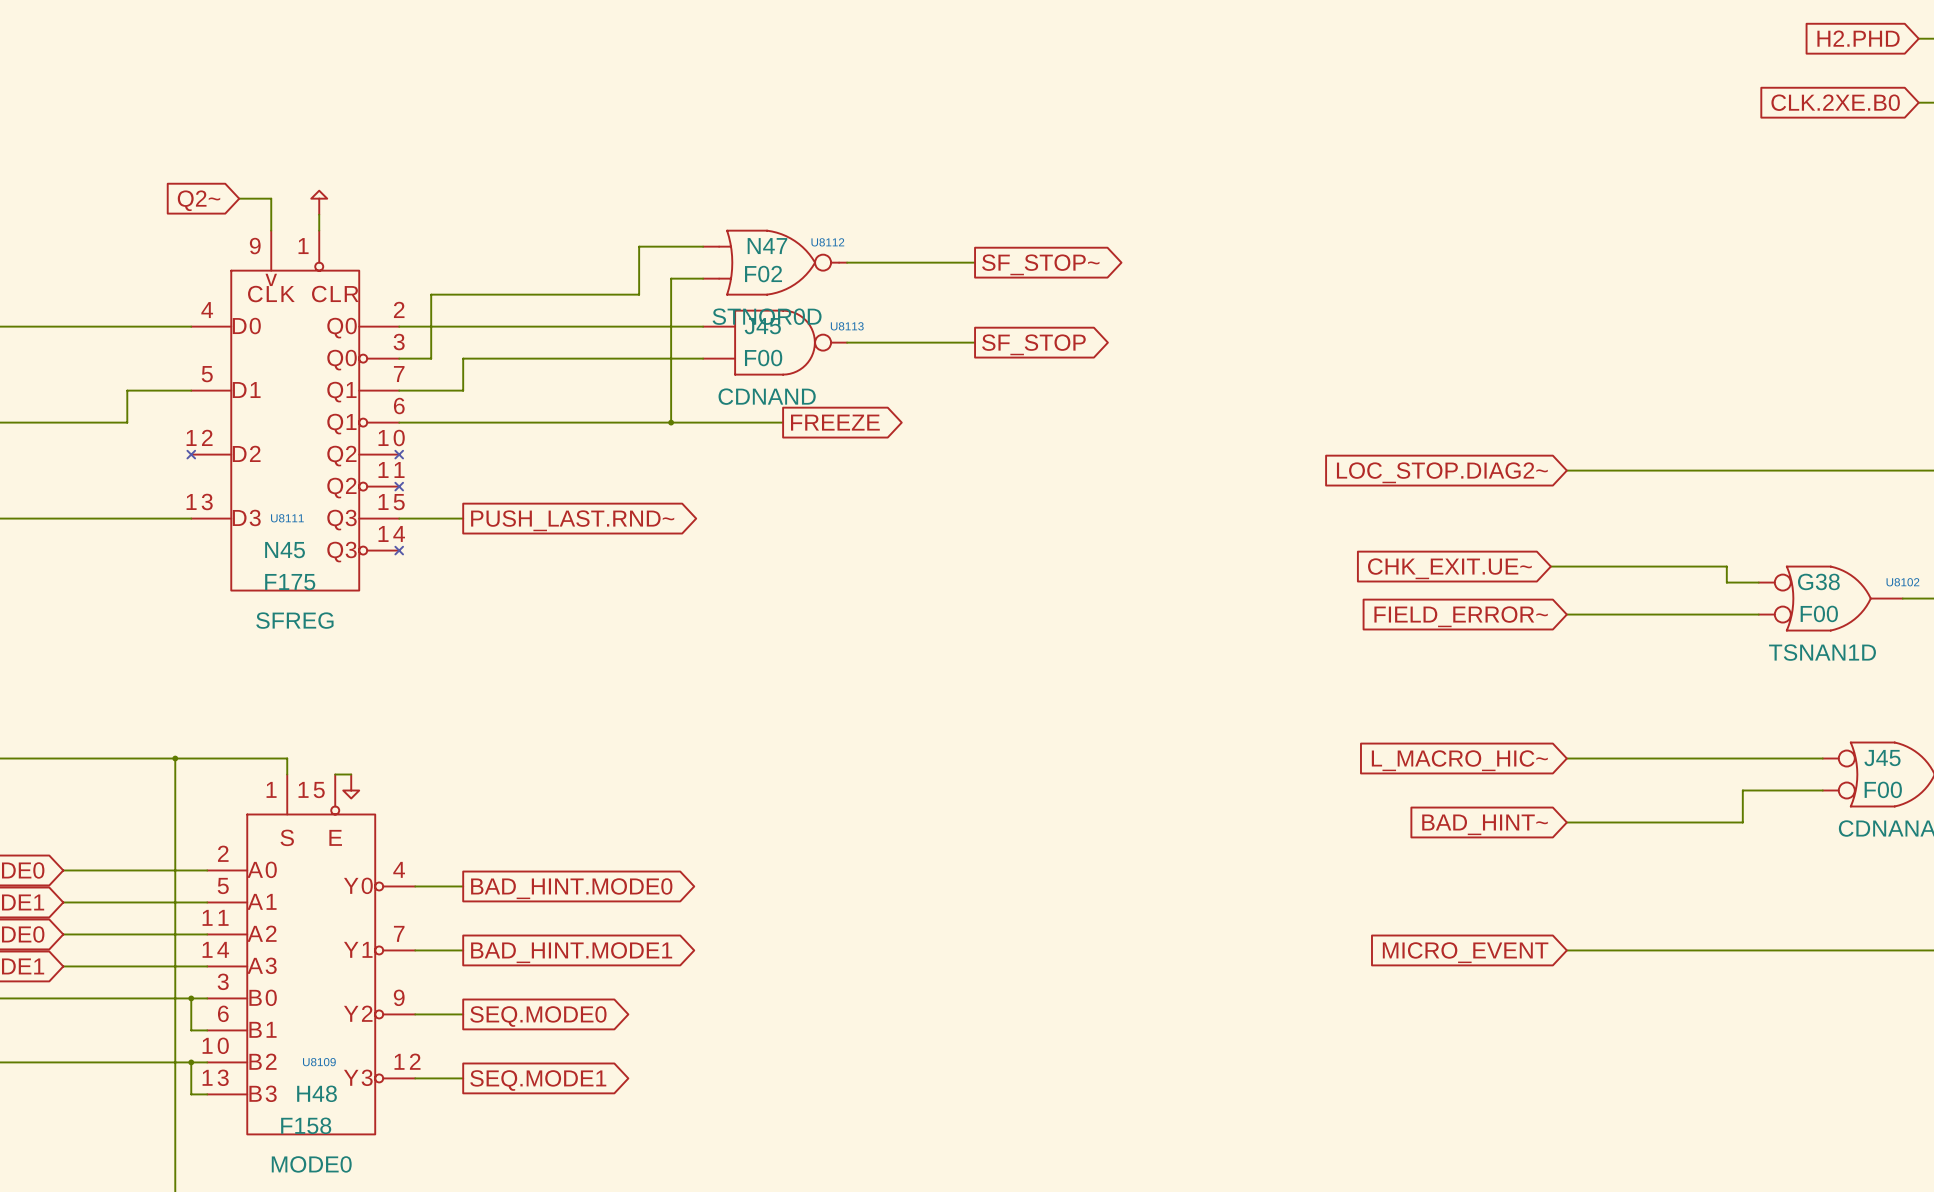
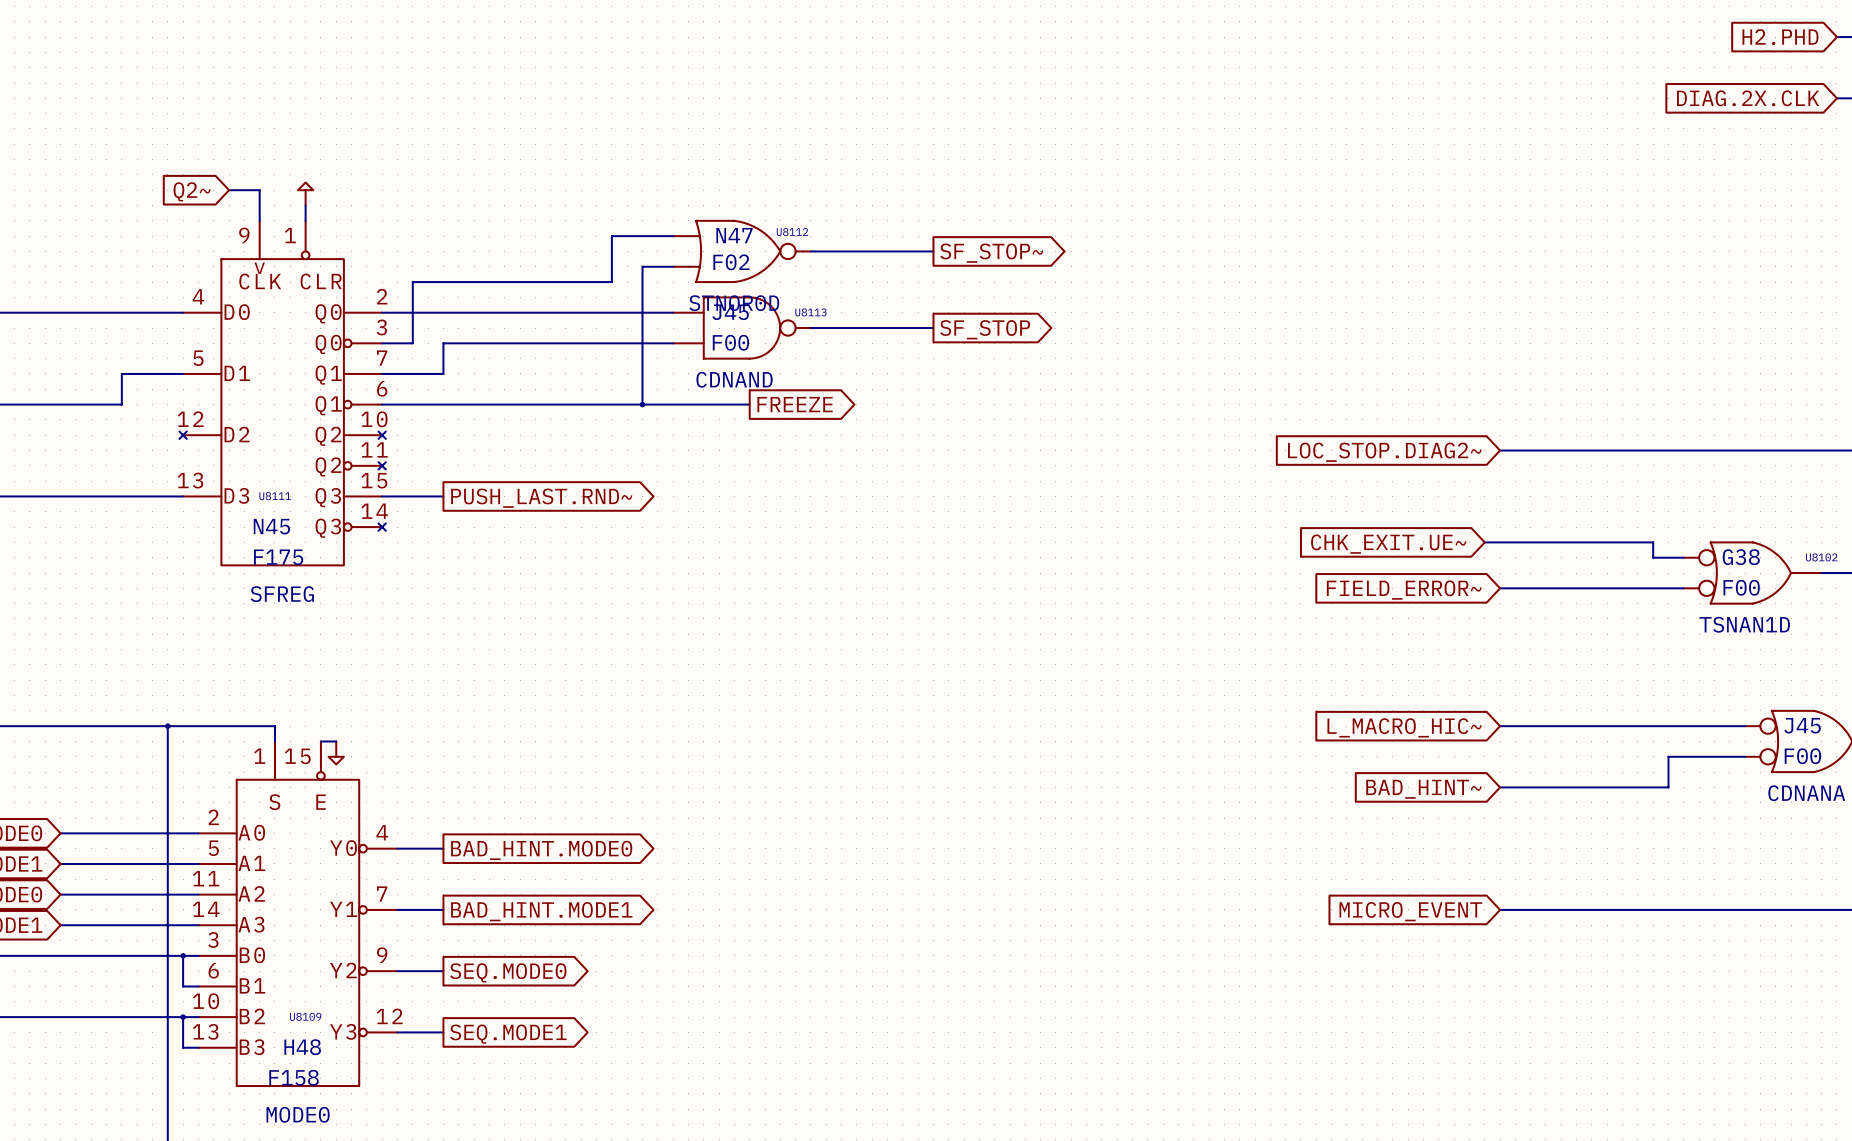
global label: CLK.2XE.B0 (1835, 102) -> DIAG.2X.CLK (1748, 98)

